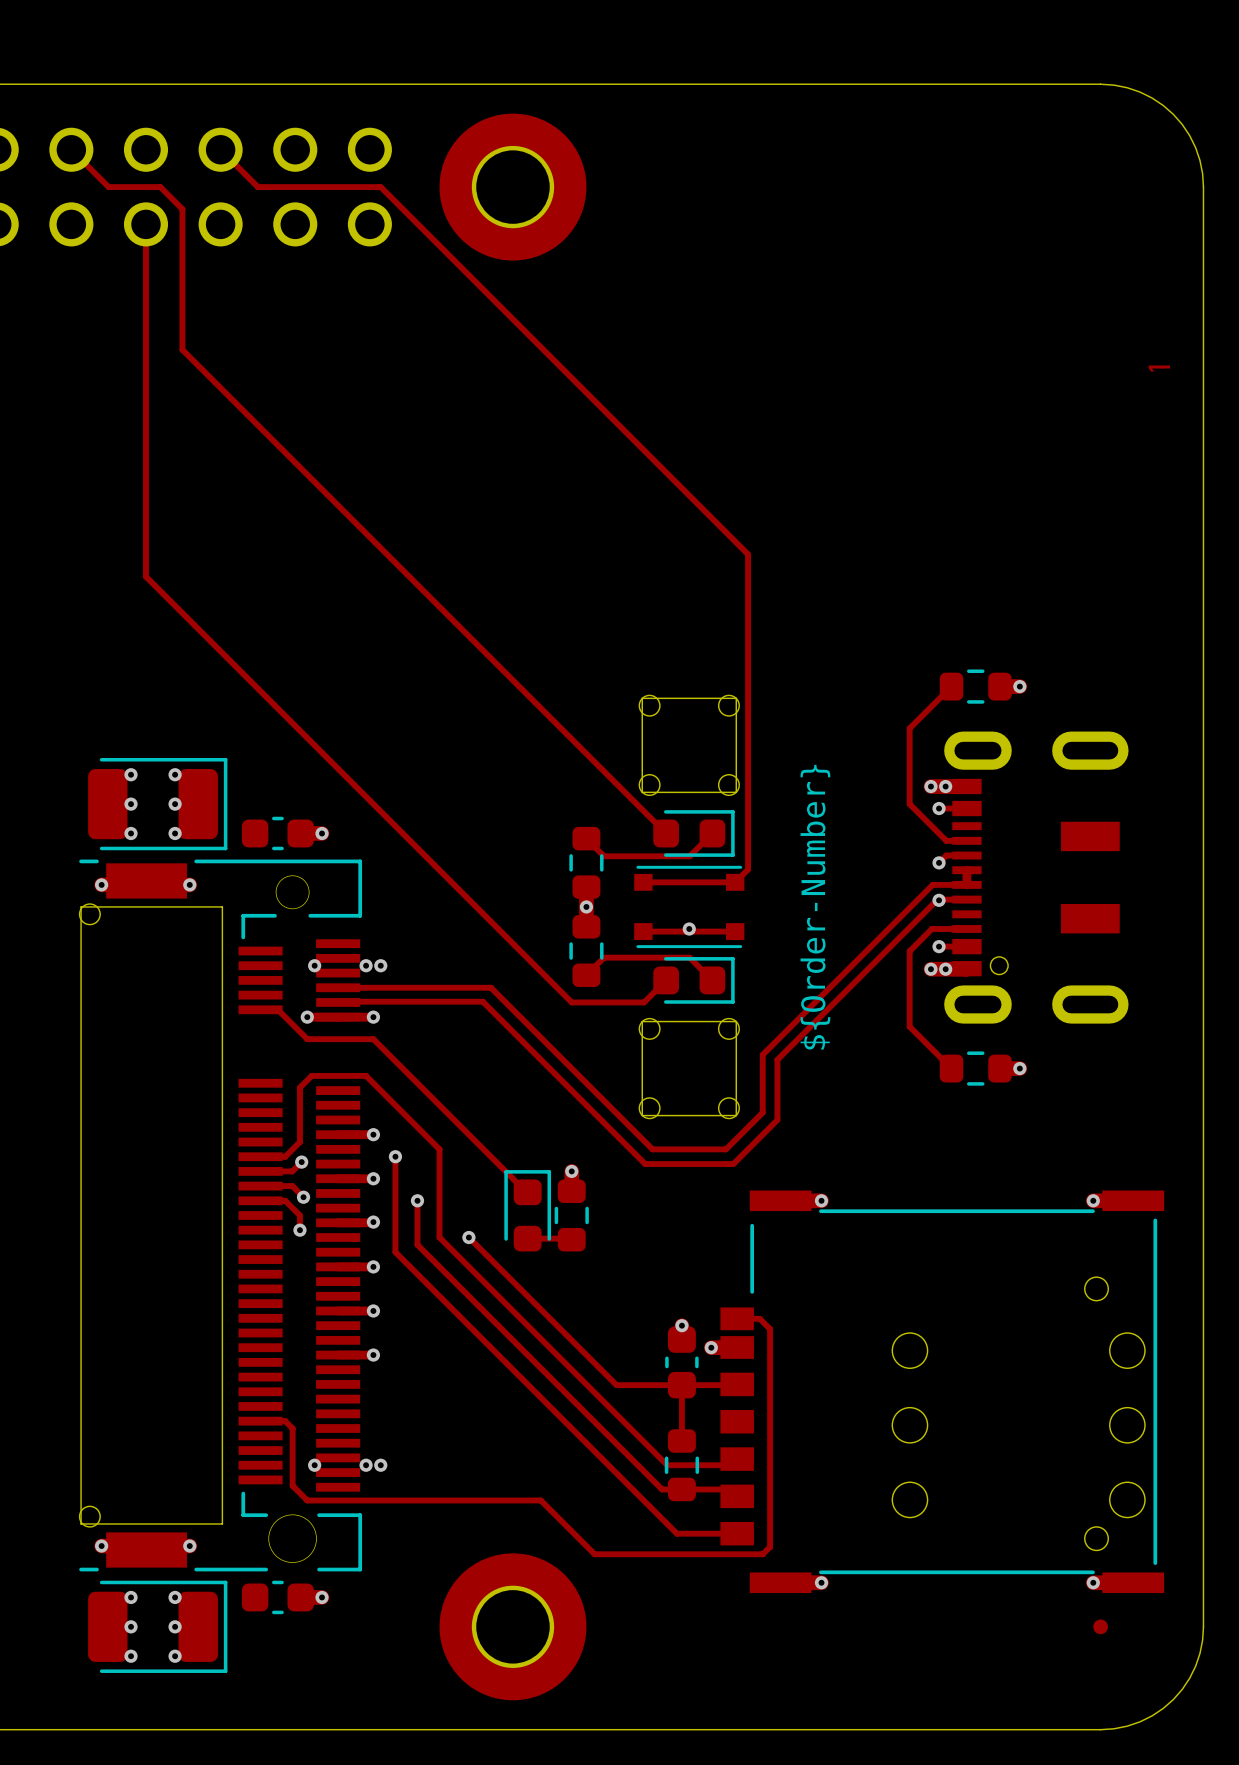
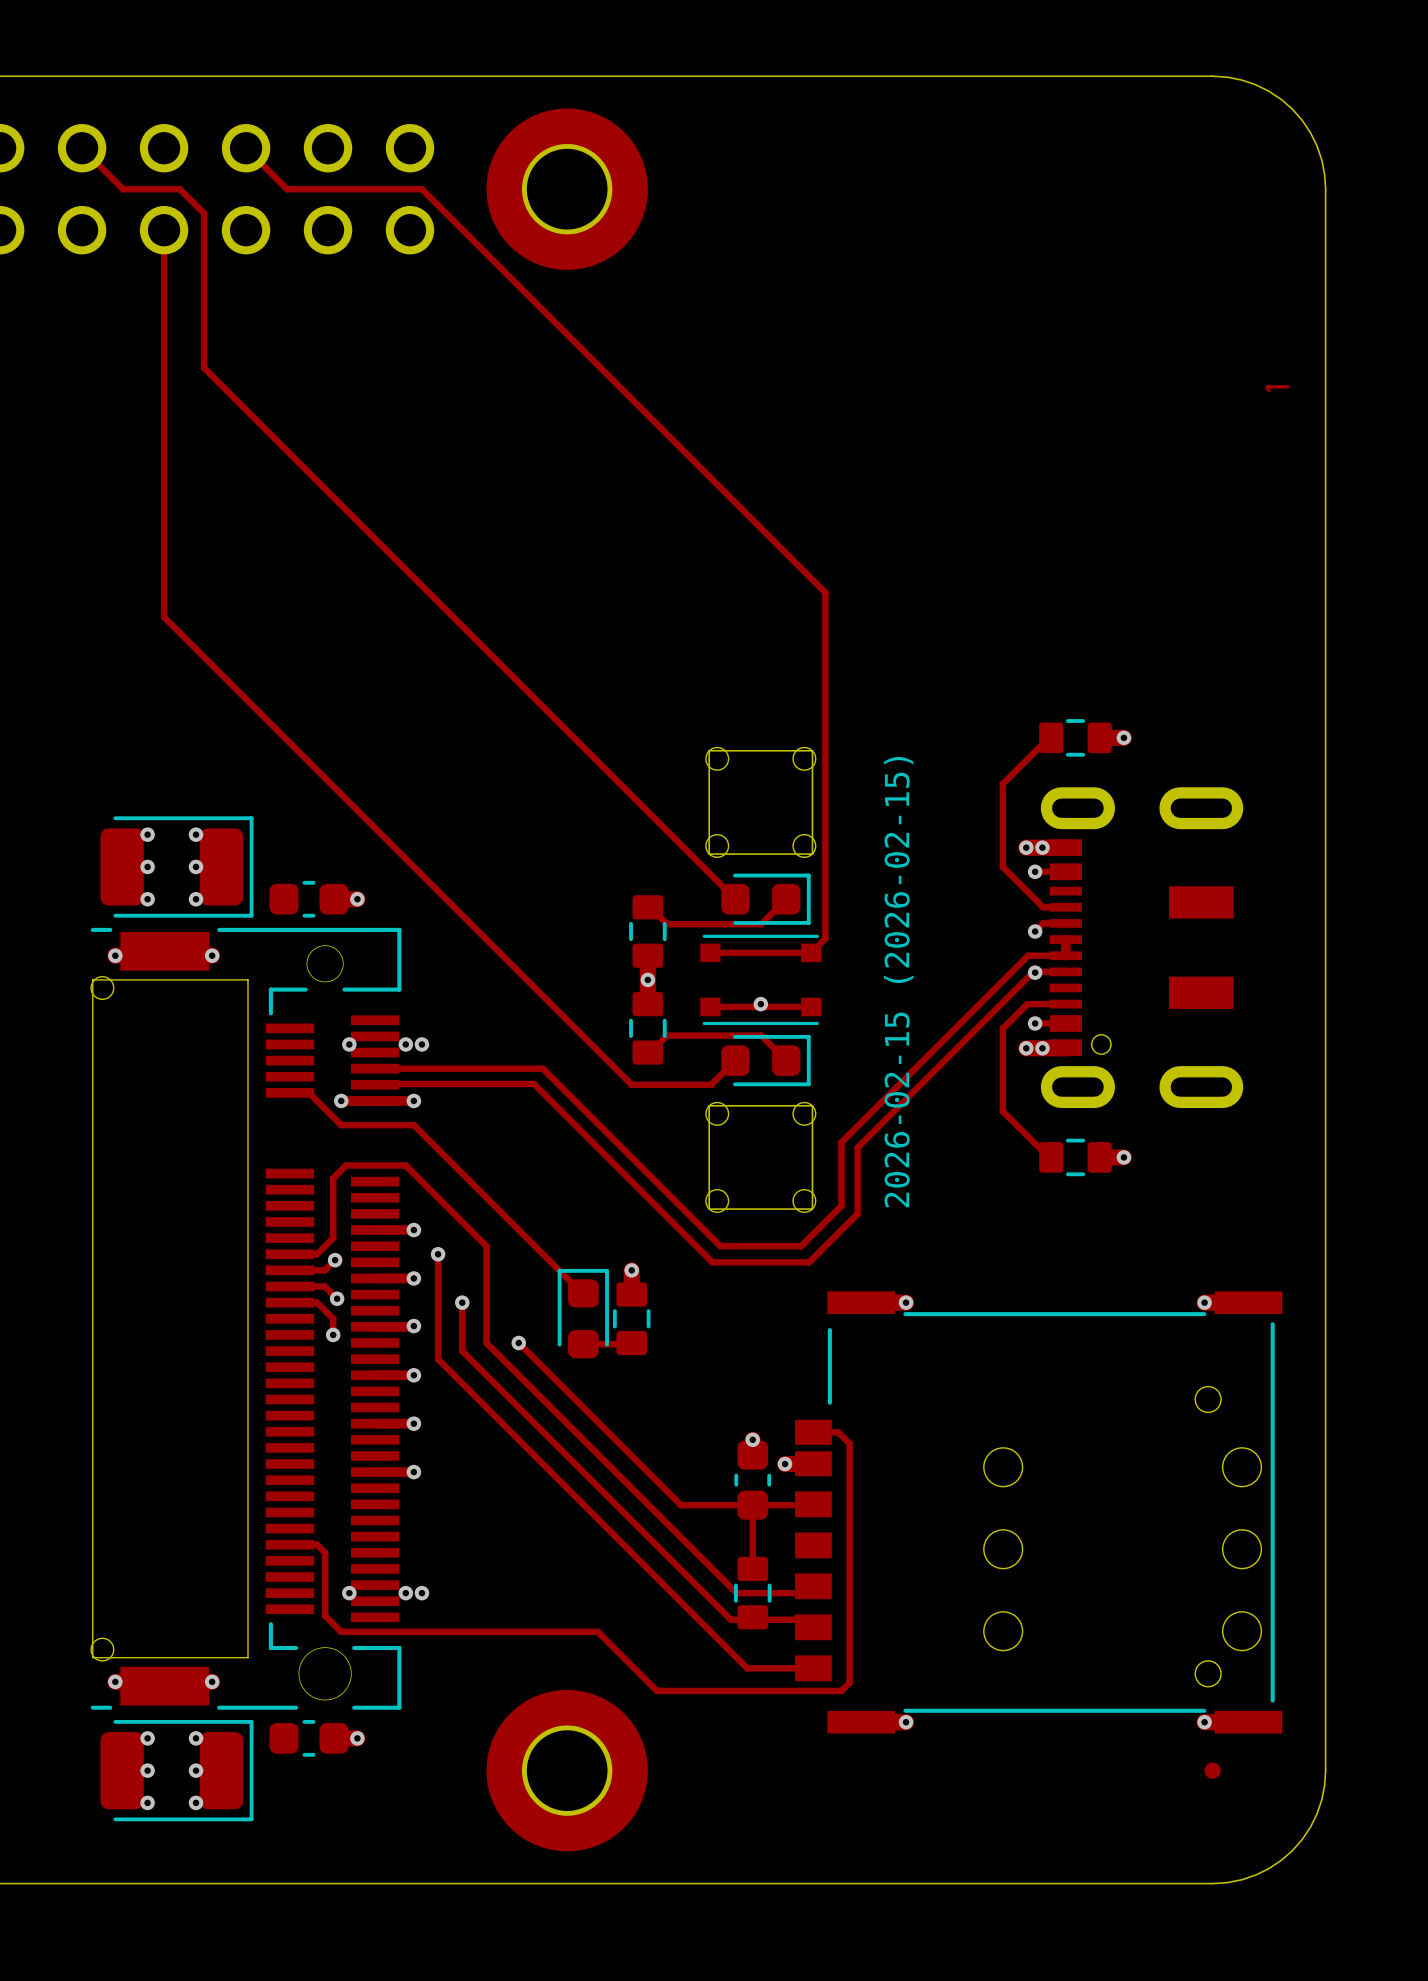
part footprint: [939, 669, 1012, 704] -> [1039, 719, 1112, 757]
drawing shape: [800, 764, 831, 1050] -> [883, 756, 914, 1208]
part footprint: [569, 826, 604, 899] -> [629, 895, 667, 968]
part footprint: [569, 915, 604, 988] -> [629, 992, 667, 1065]
part footprint: [939, 1051, 1012, 1086] -> [1039, 1138, 1112, 1177]
part footprint: [554, 1179, 589, 1252] -> [612, 1282, 651, 1356]
part footprint: [664, 1429, 700, 1502] -> [733, 1556, 772, 1630]

